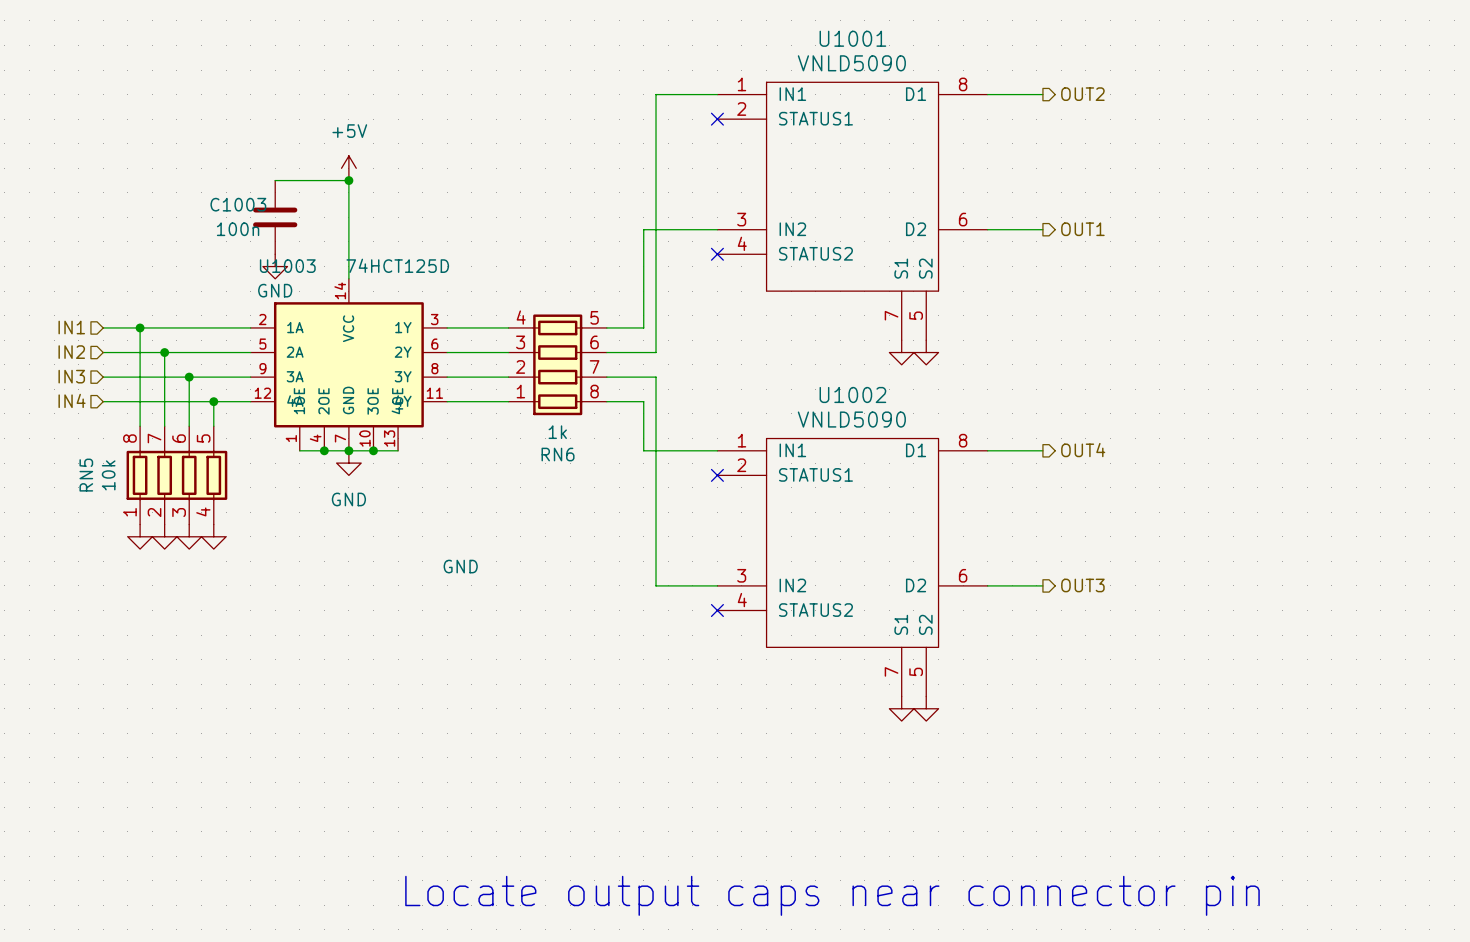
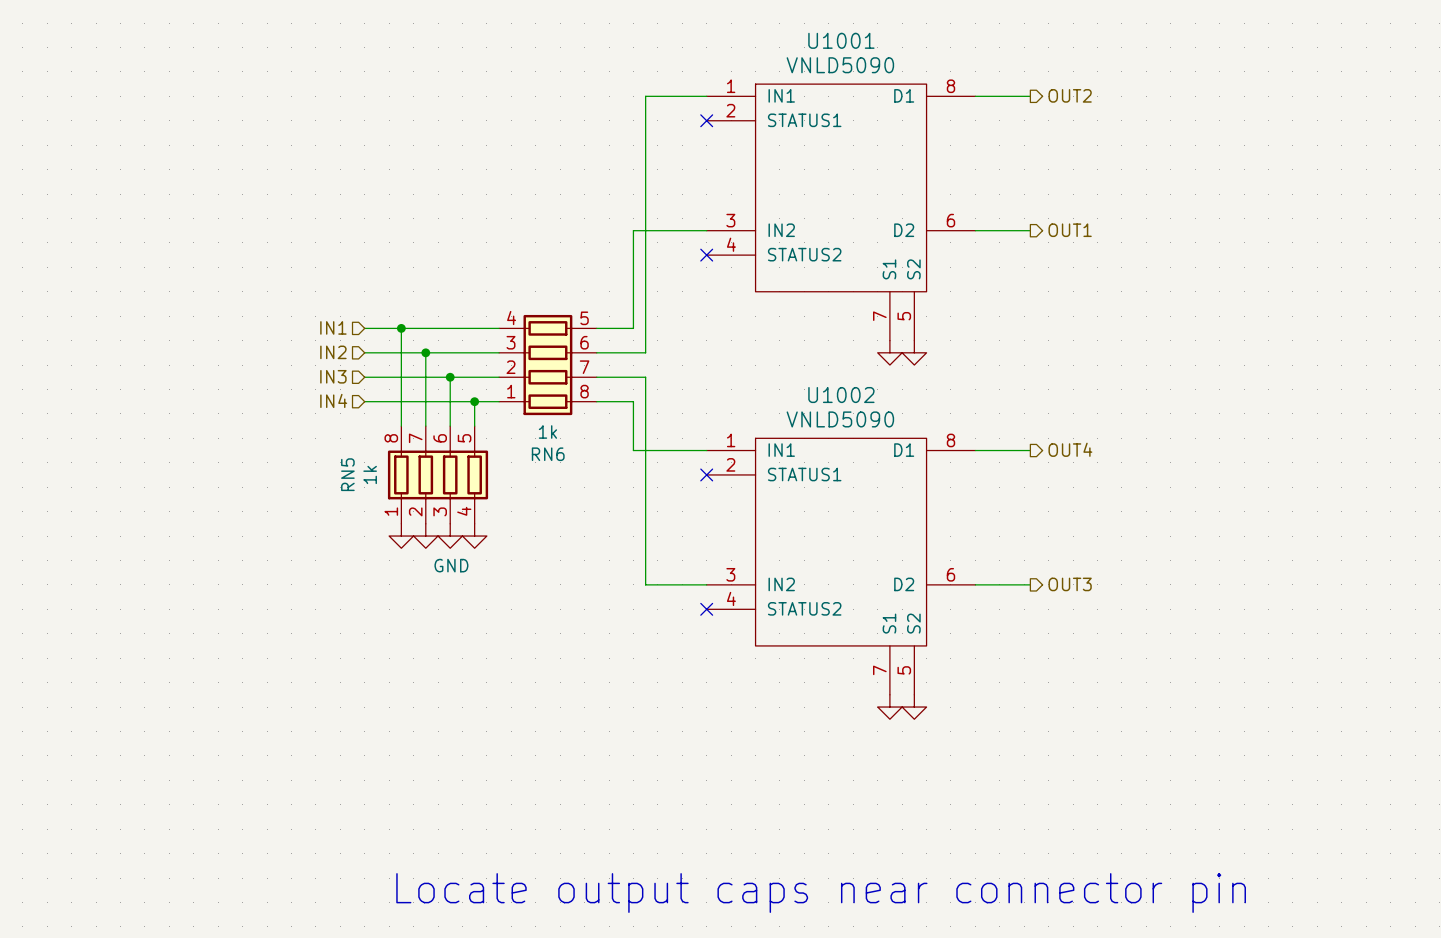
power symbol: +5V (348, 168) -> none
wire: (275, 180) (348, 180) (348, 278) -> none
junction: (348, 180) -> none
C1003: 100n (275, 217) -> none
power symbol: GND (275, 266) -> none
hierarchical label: IN1 (71, 327) -> none
wire: (103, 327) (250, 327) -> none
wire: (140, 327) (140, 426) -> none
junction: (140, 327) -> none
hierarchical label: none -> IN1 (333, 327)
junction: none -> (401, 328)
hierarchical label: IN2 (71, 352) -> none
wire: (103, 352) (250, 352) -> none
wire: (164, 352) (164, 426) -> none
junction: (164, 352) -> none
hierarchical label: none -> IN2 (333, 352)
wire: none -> (425, 352) (425, 426)
junction: none -> (425, 352)
U1003: 74HCT125D (348, 364) -> none
hierarchical label: IN3 (71, 376) -> none
hierarchical label: none -> IN3 (333, 376)
wire: (103, 377) (250, 377) -> none
wire: (189, 377) (189, 426) -> none
junction: (189, 377) -> none
wire: none -> (450, 377) (450, 426)
junction: none -> (450, 377)
hierarchical label: IN4 (72, 400) -> none
hierarchical label: none -> IN4 (333, 400)
wire: (103, 401) (250, 401) -> none
wire: (213, 401) (213, 426) -> none
junction: (213, 401) -> none
wire: none -> (474, 401) (474, 426)
junction: none -> (474, 401)
wire: (299, 450) (398, 450) -> none
junction: (324, 450) -> none
junction: (348, 450) -> none
junction: (373, 450) -> none
power symbol position: GND (348, 463) -> GND (450, 536)
RN5 value: 10k (108, 475) -> 1k (370, 474)
RN5 position: (176, 475) -> (438, 474)
power symbol text position: GND (348, 499) -> GND (451, 565)
power symbol: (140, 536) -> none
power symbol: (164, 536) -> none
power symbol: GND (189, 536) -> none
power symbol: (213, 536) -> none
power symbol: none -> (401, 536)
power symbol: none -> (425, 536)
power symbol: none -> (474, 536)

